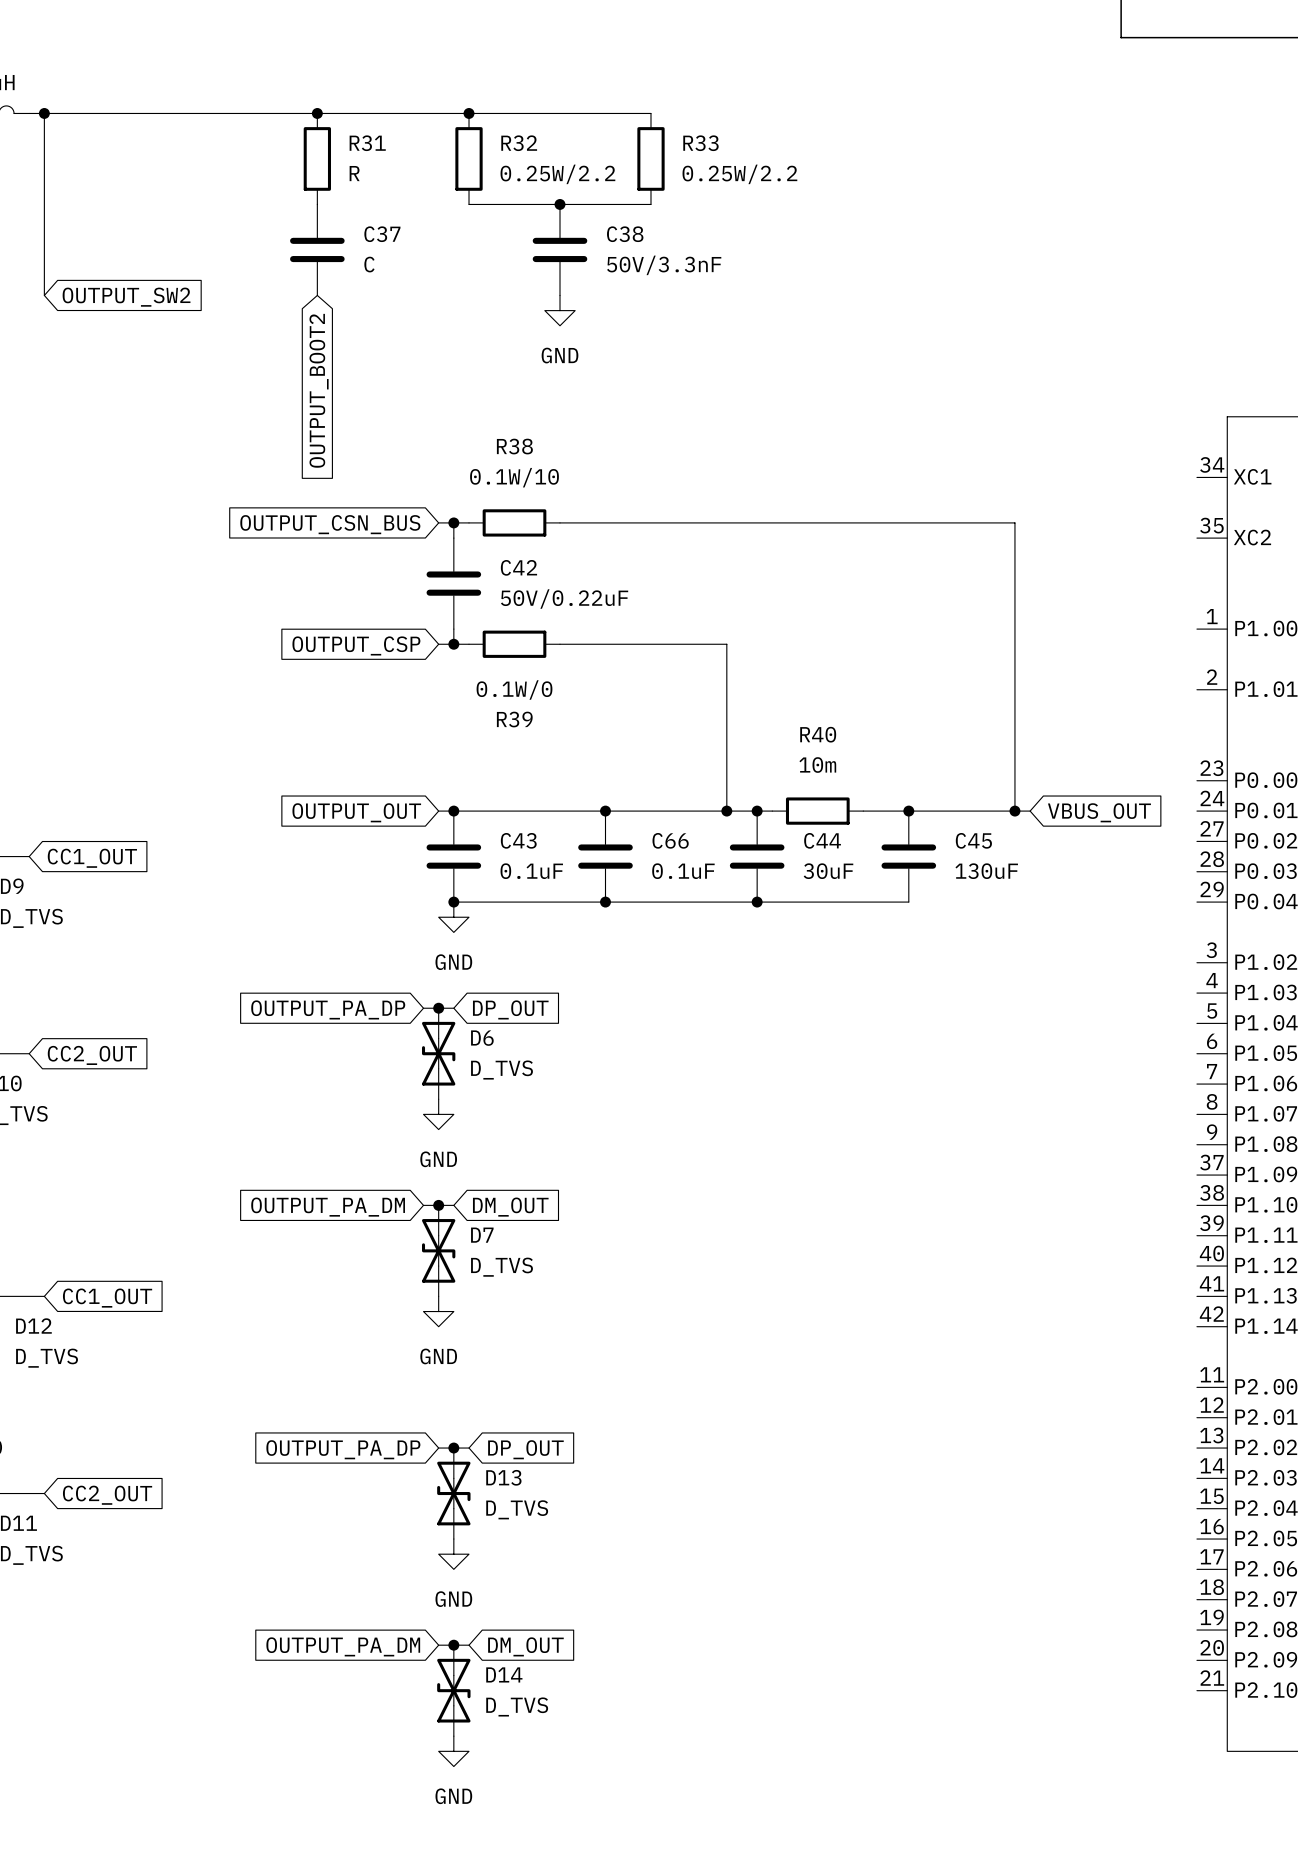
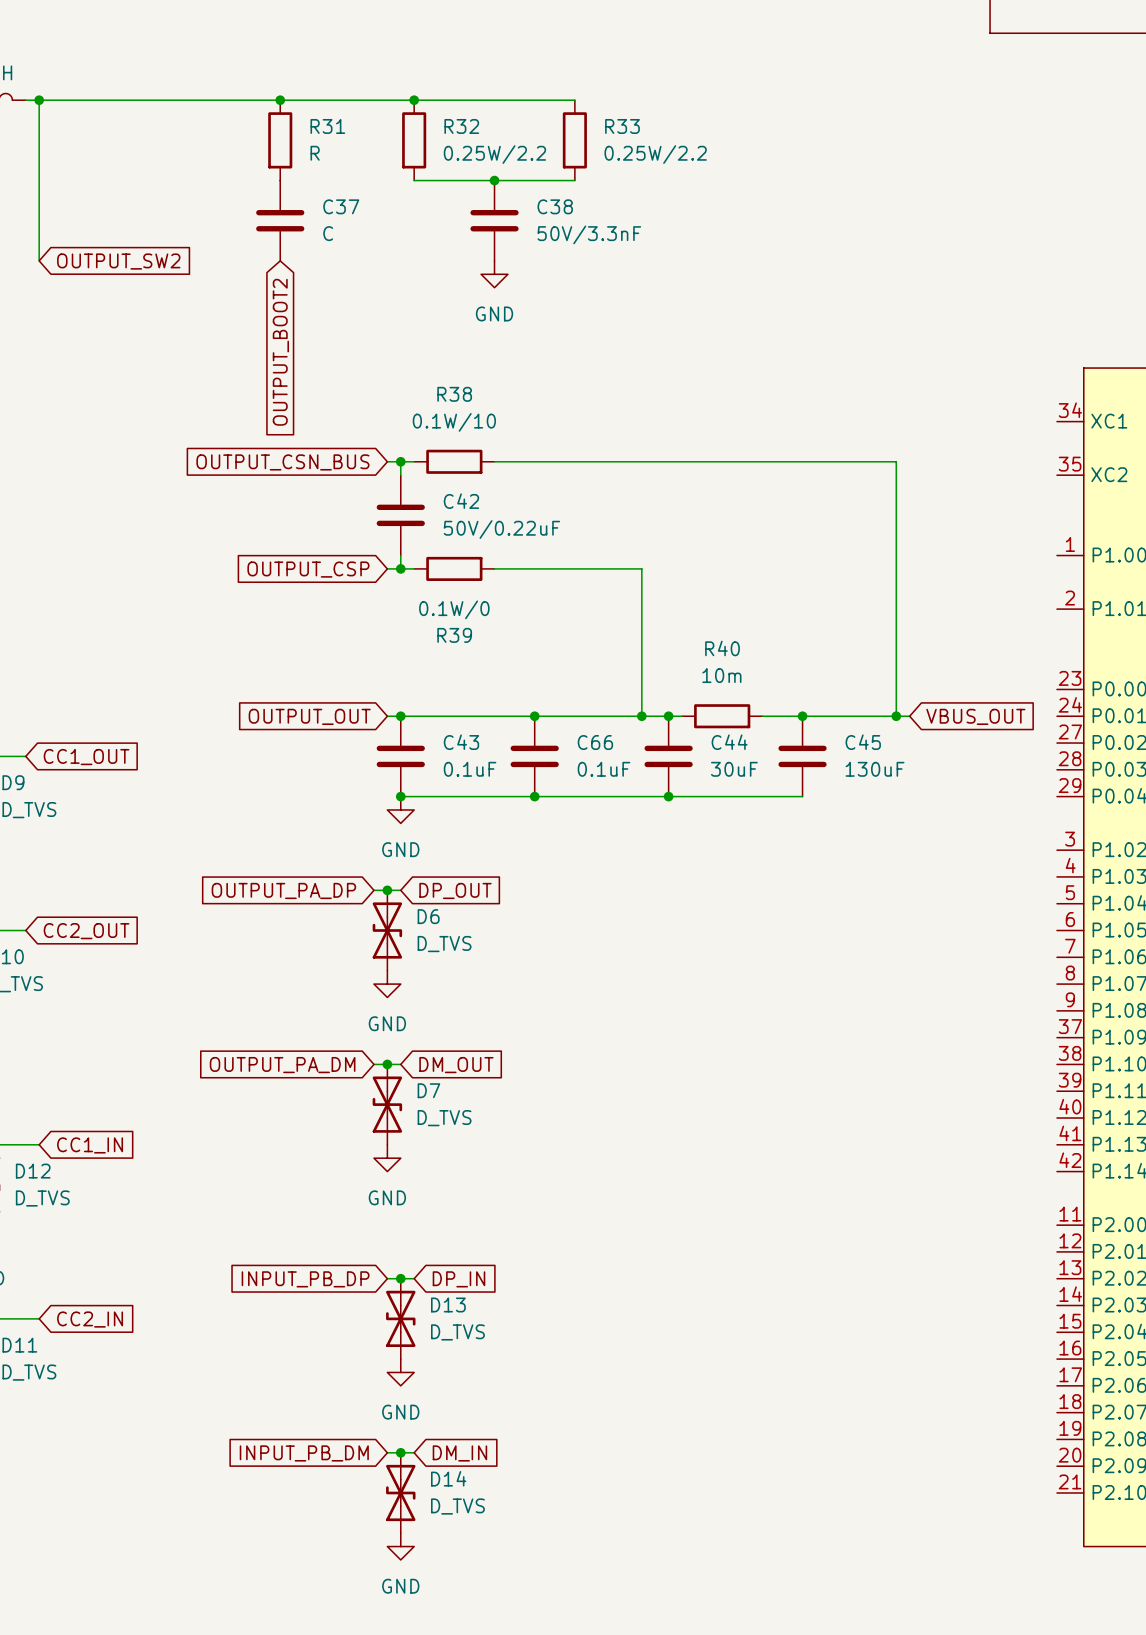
global label: CC1_OUT (107, 1298) -> CC1_IN (90, 1145)
global label: OUTPUT_PA_DP (343, 1449) -> INPUT_PB_DP (305, 1279)
global label: DP_OUT (525, 1449) -> DP_IN (458, 1279)
global label: CC2_OUT (107, 1495) -> CC2_IN (90, 1319)
global label: OUTPUT_PA_DM (343, 1646) -> INPUT_PB_DM (304, 1453)
global label: DM_OUT (525, 1646) -> DM_IN (459, 1453)

